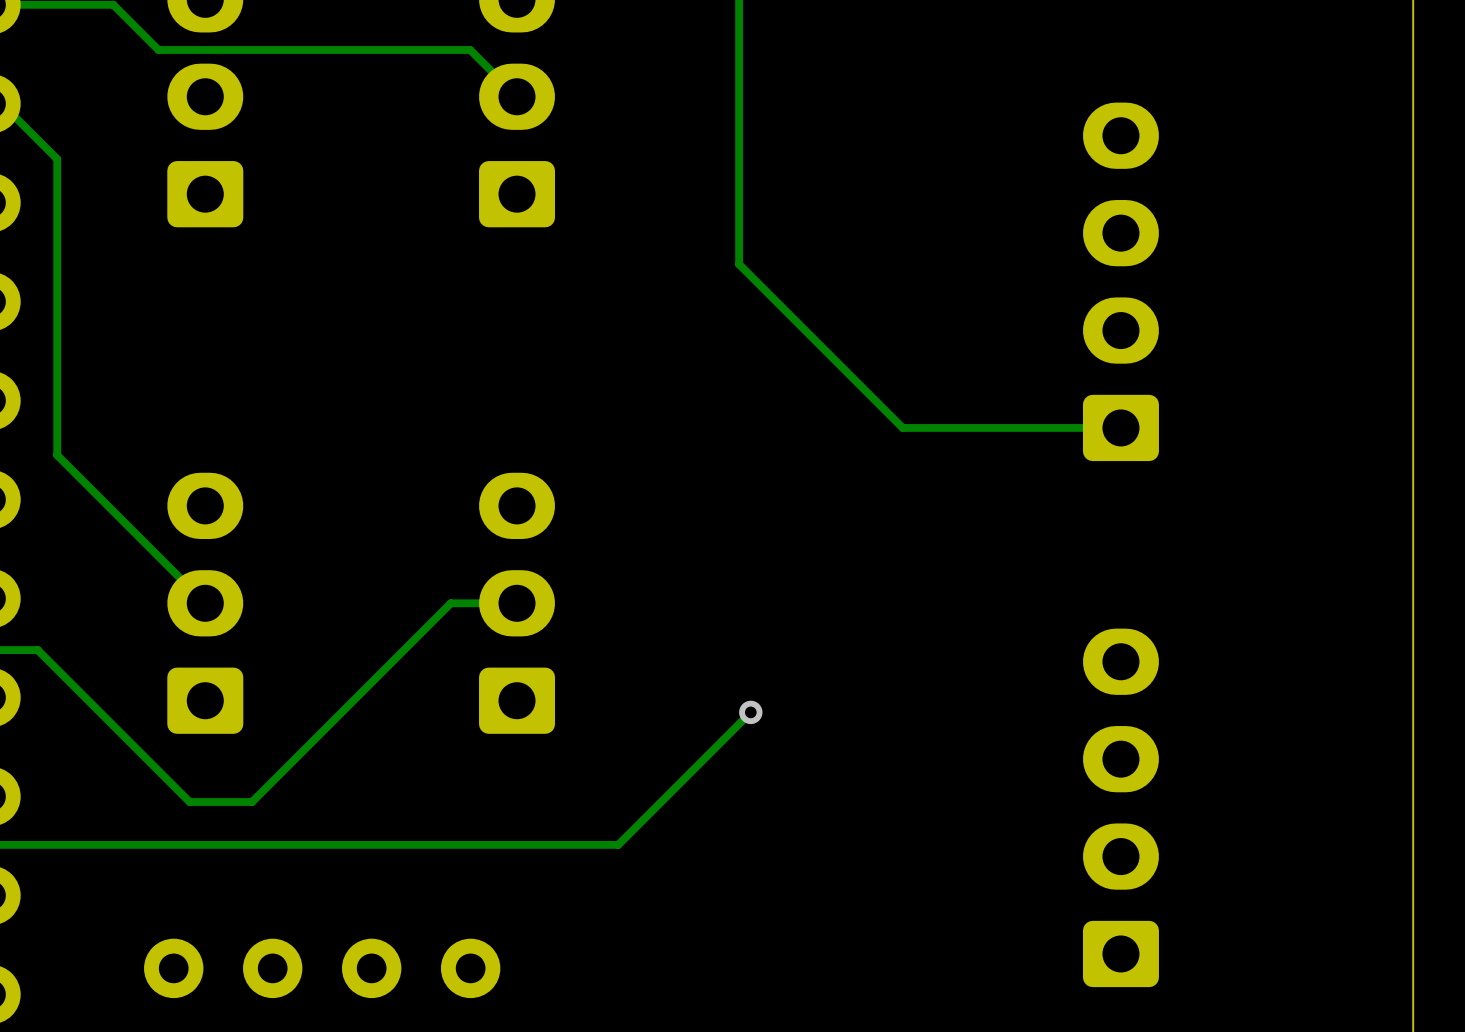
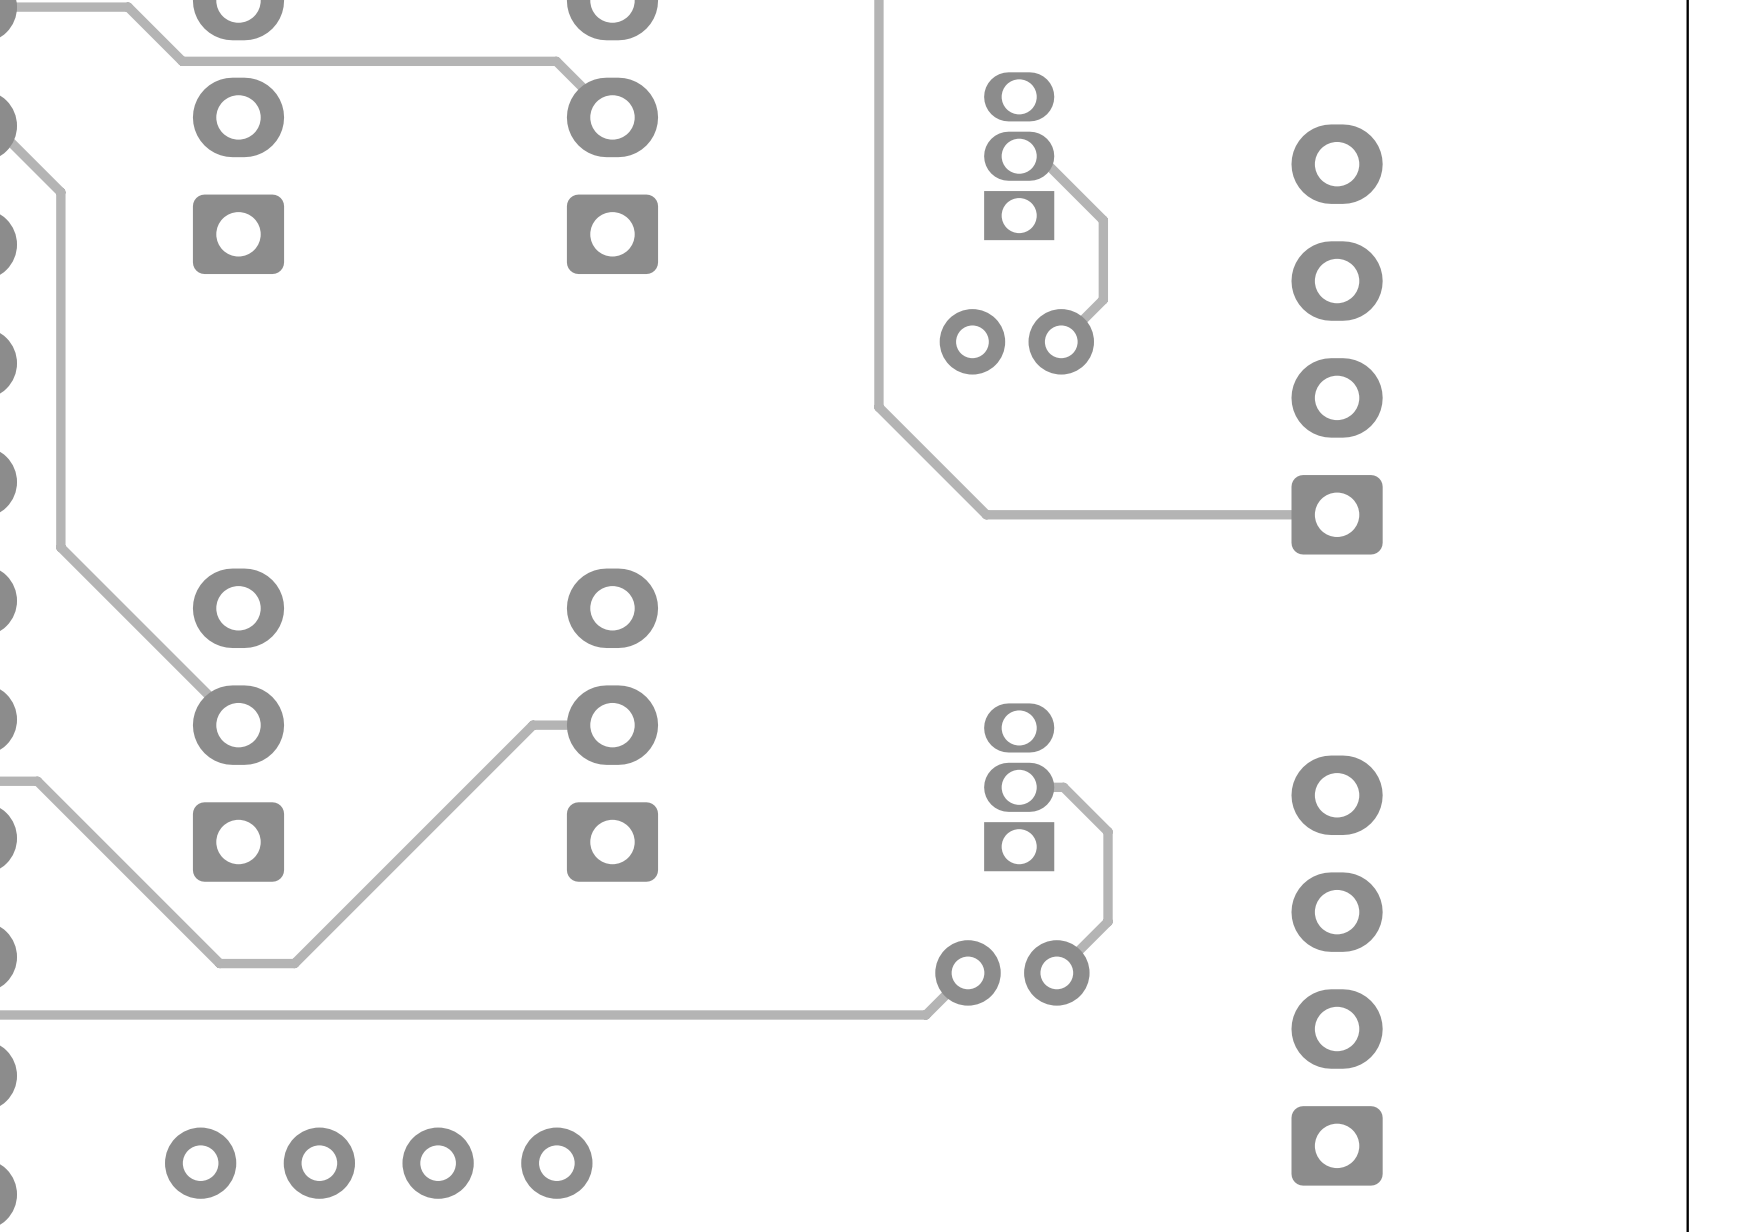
track: none -> (1019, 156) (1039, 156) (1103, 220) (1103, 299) (1061, 341)
part: none -> (1019, 156)
track: (739, 264) (902, 427) -> (878, 318) (878, 407) (986, 514) (1075, 514)
part: none -> (1016, 341)
track: none -> (1019, 787) (1063, 787) (1108, 831) (1108, 921) (1056, 972)
part: none -> (1019, 787)
track: (750, 712) (618, 844) -> (968, 972) (925, 1014) (734, 1014)
via: (750, 712) -> none
part: none -> (1012, 972)

